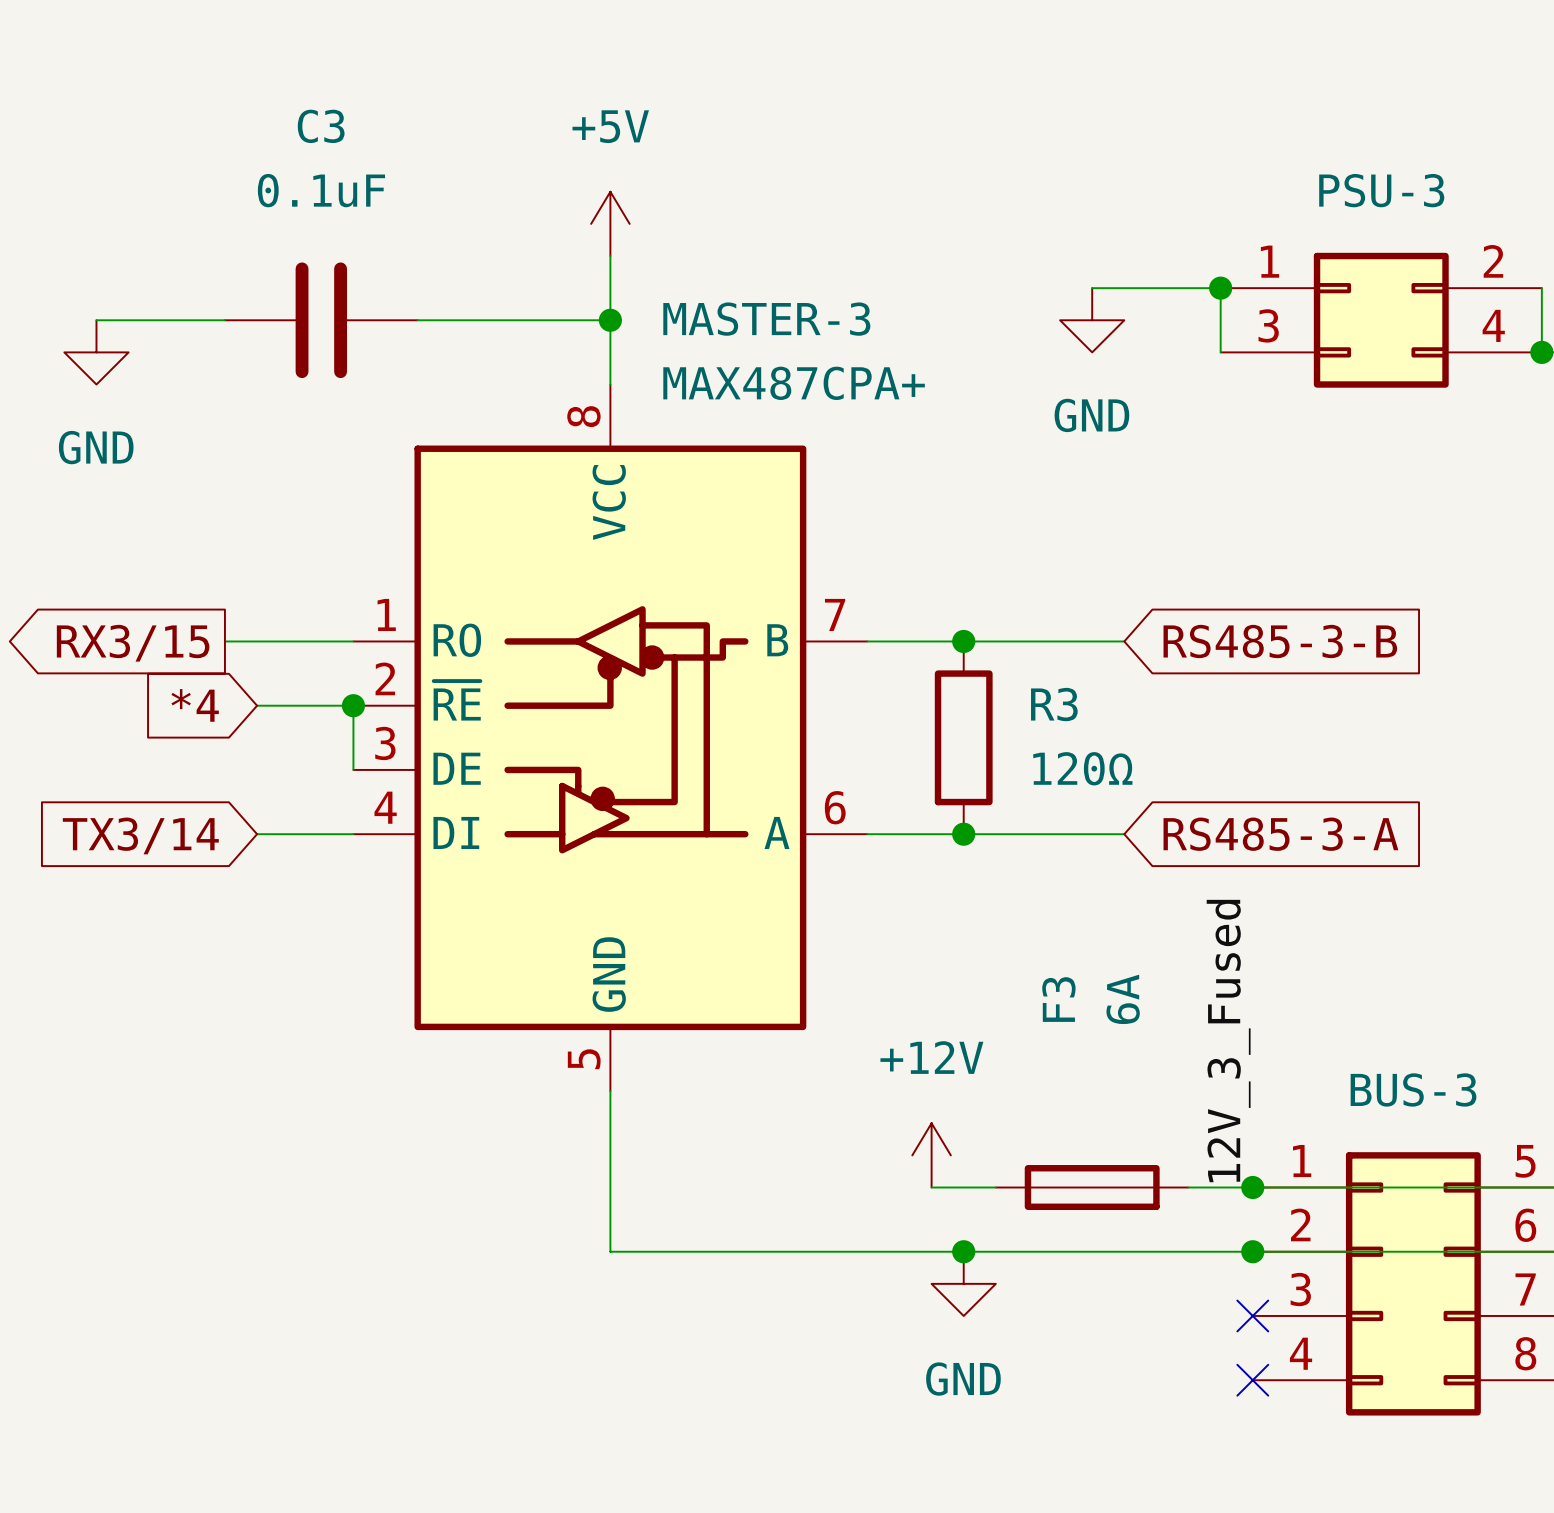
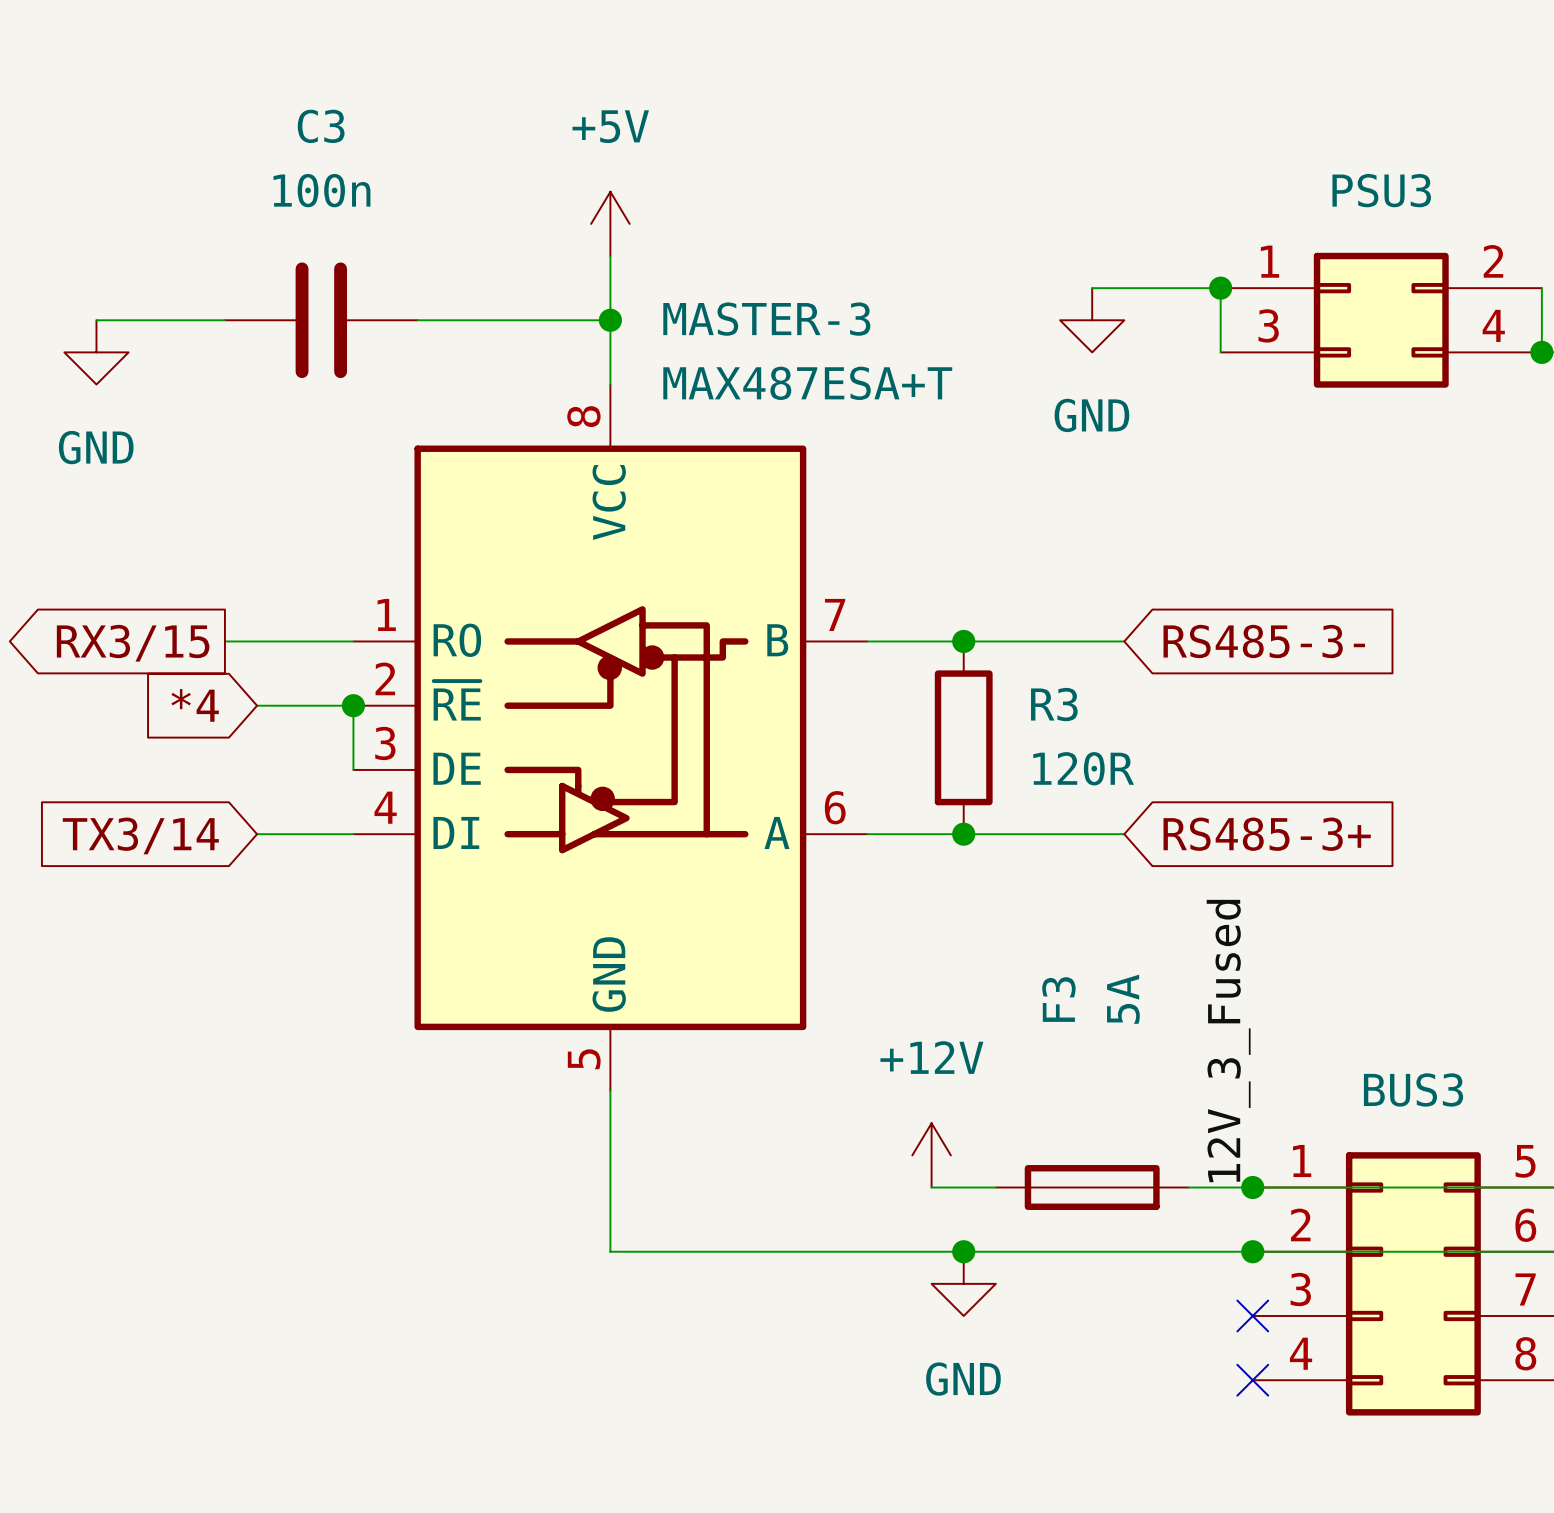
C3 value: 0.1uF (321, 190) -> 100n (322, 190)
PSU-3 name: PSU-3 (1381, 190) -> PSU3 (1381, 190)
MASTER-3 value: MAX487CPA+ (794, 383) -> MAX487ESA+T (807, 383)
global label: RS485-3-B (1280, 641) -> RS485-3- (1264, 641)
R3 value: 120Ω (1082, 768) -> 120R (1083, 768)
global label: RS485-3-A (1280, 834) -> RS485-3+ (1267, 834)
F3 value: 6A (1123, 999) -> 5A (1123, 999)
BUS-3 name: BUS-3 (1413, 1089) -> BUS3 (1413, 1089)

